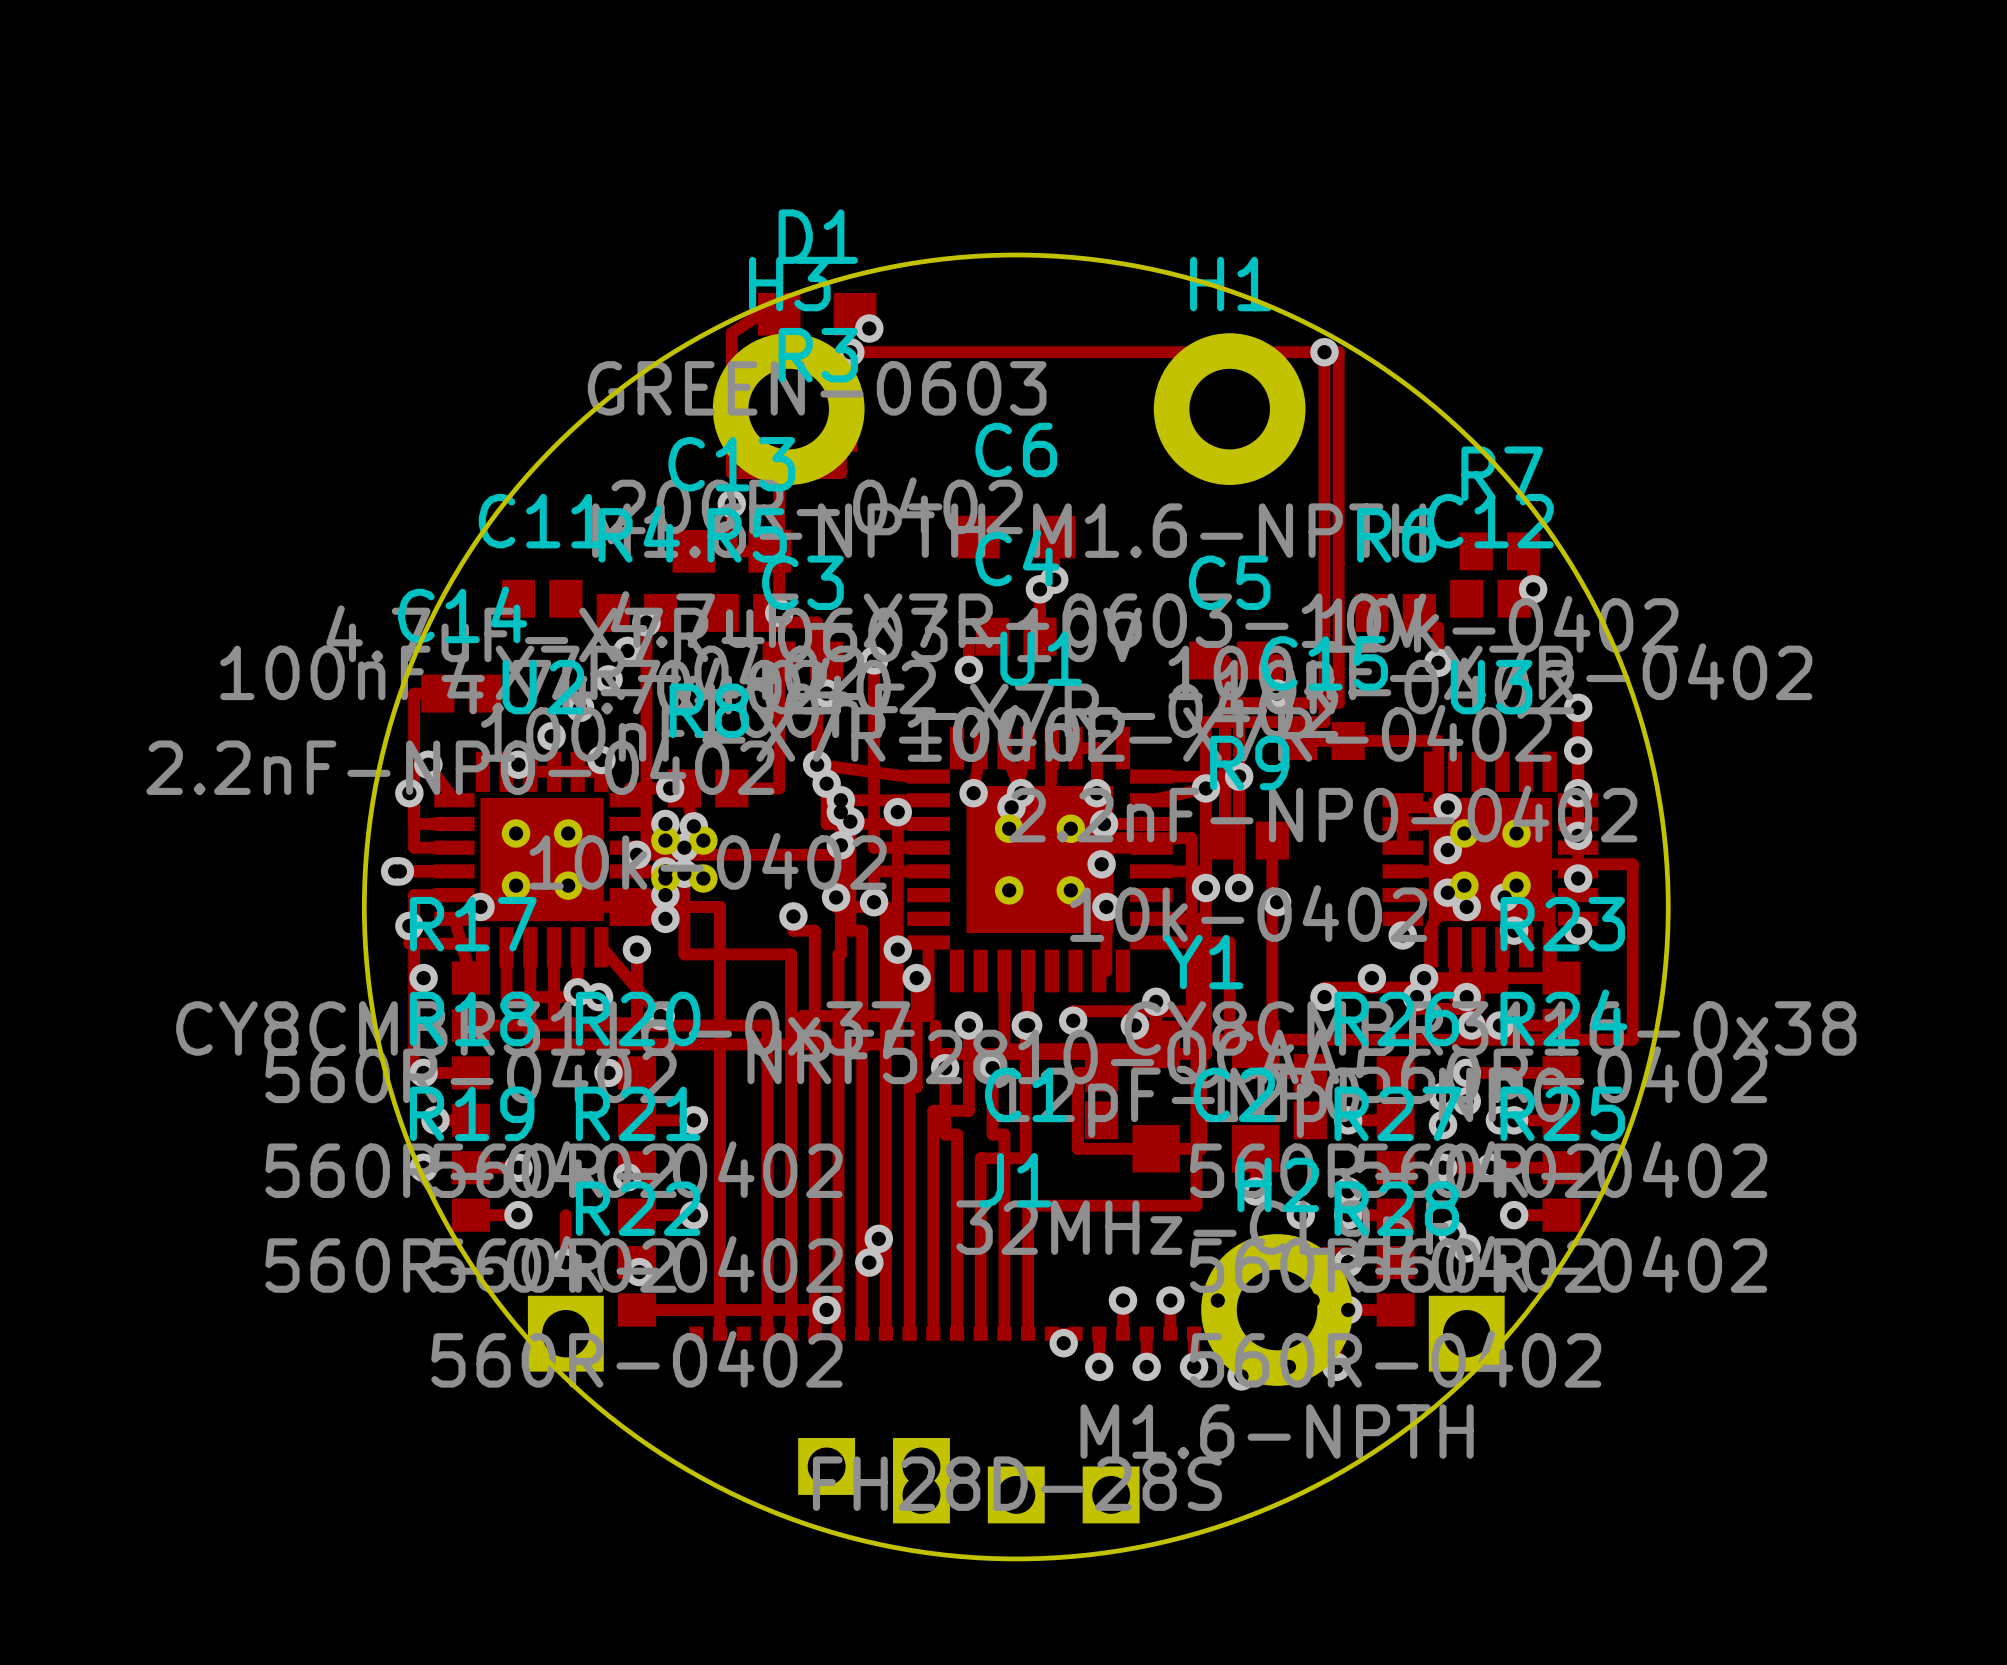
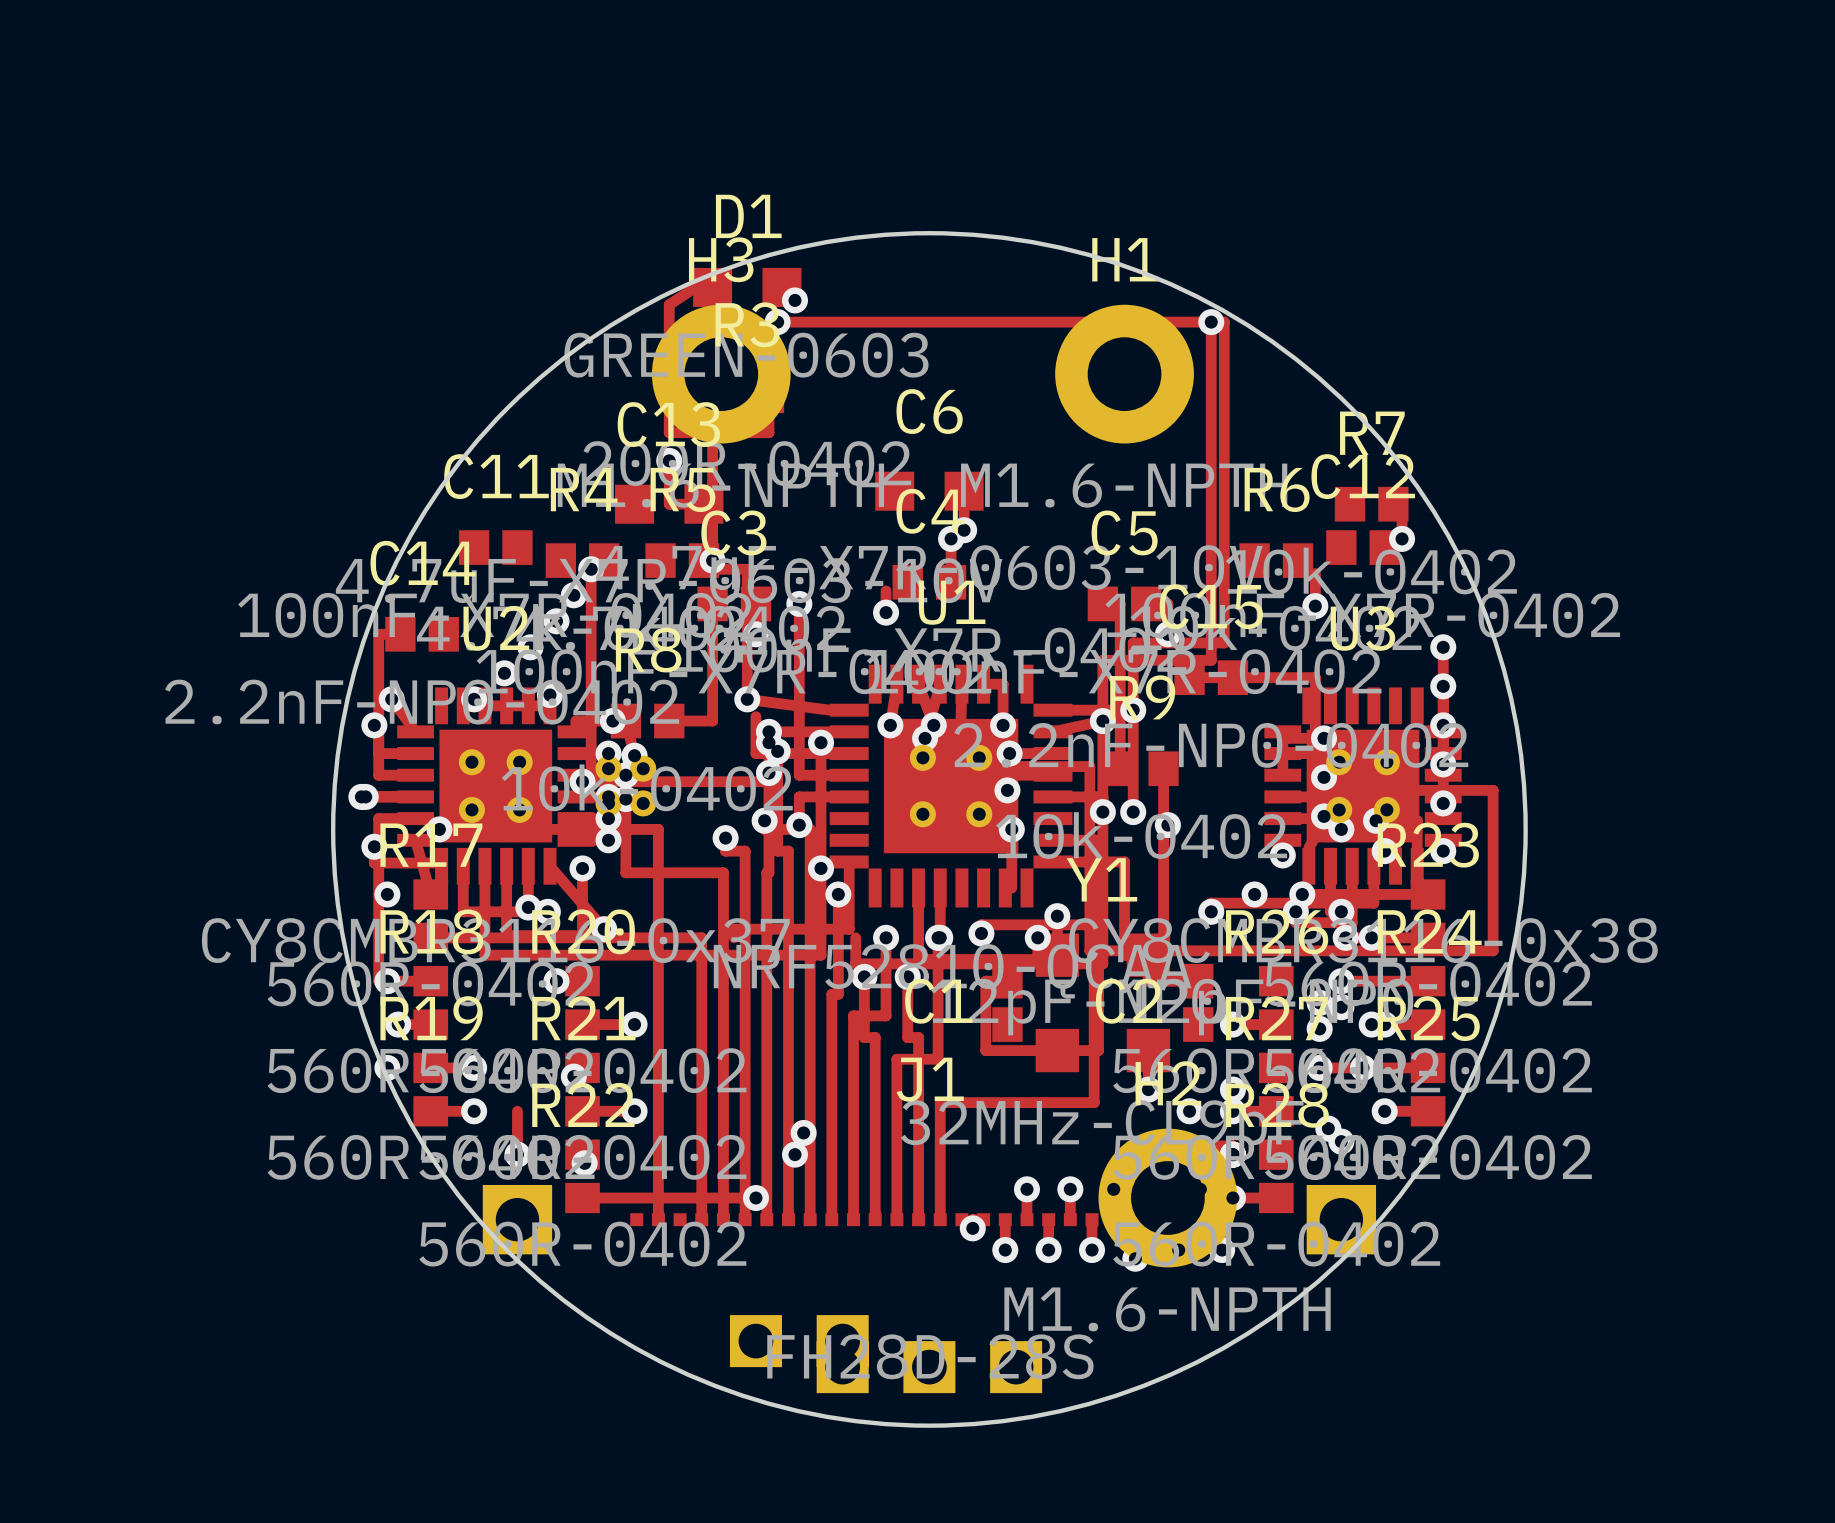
via: (826, 783) -> none

